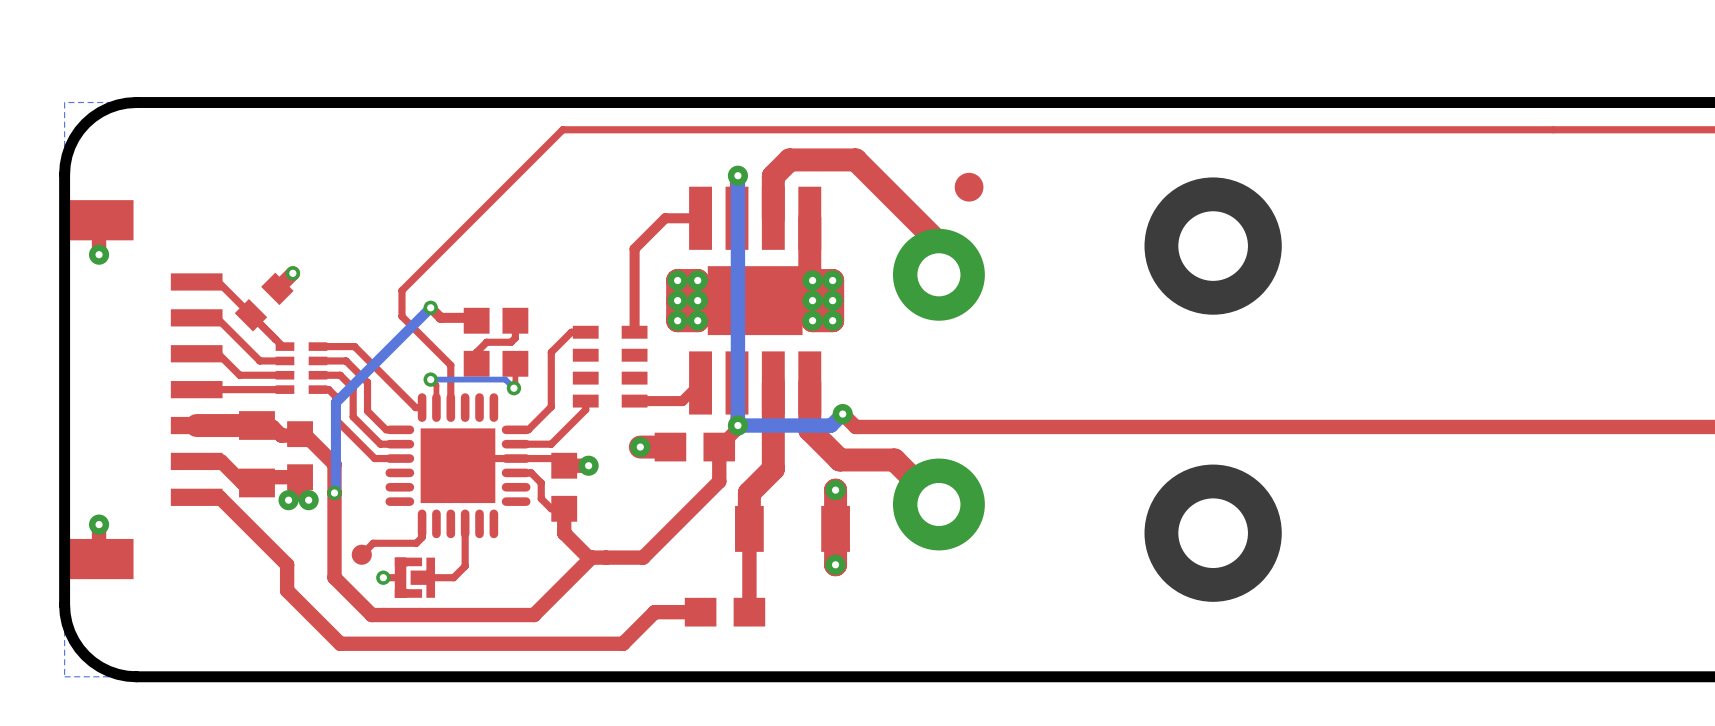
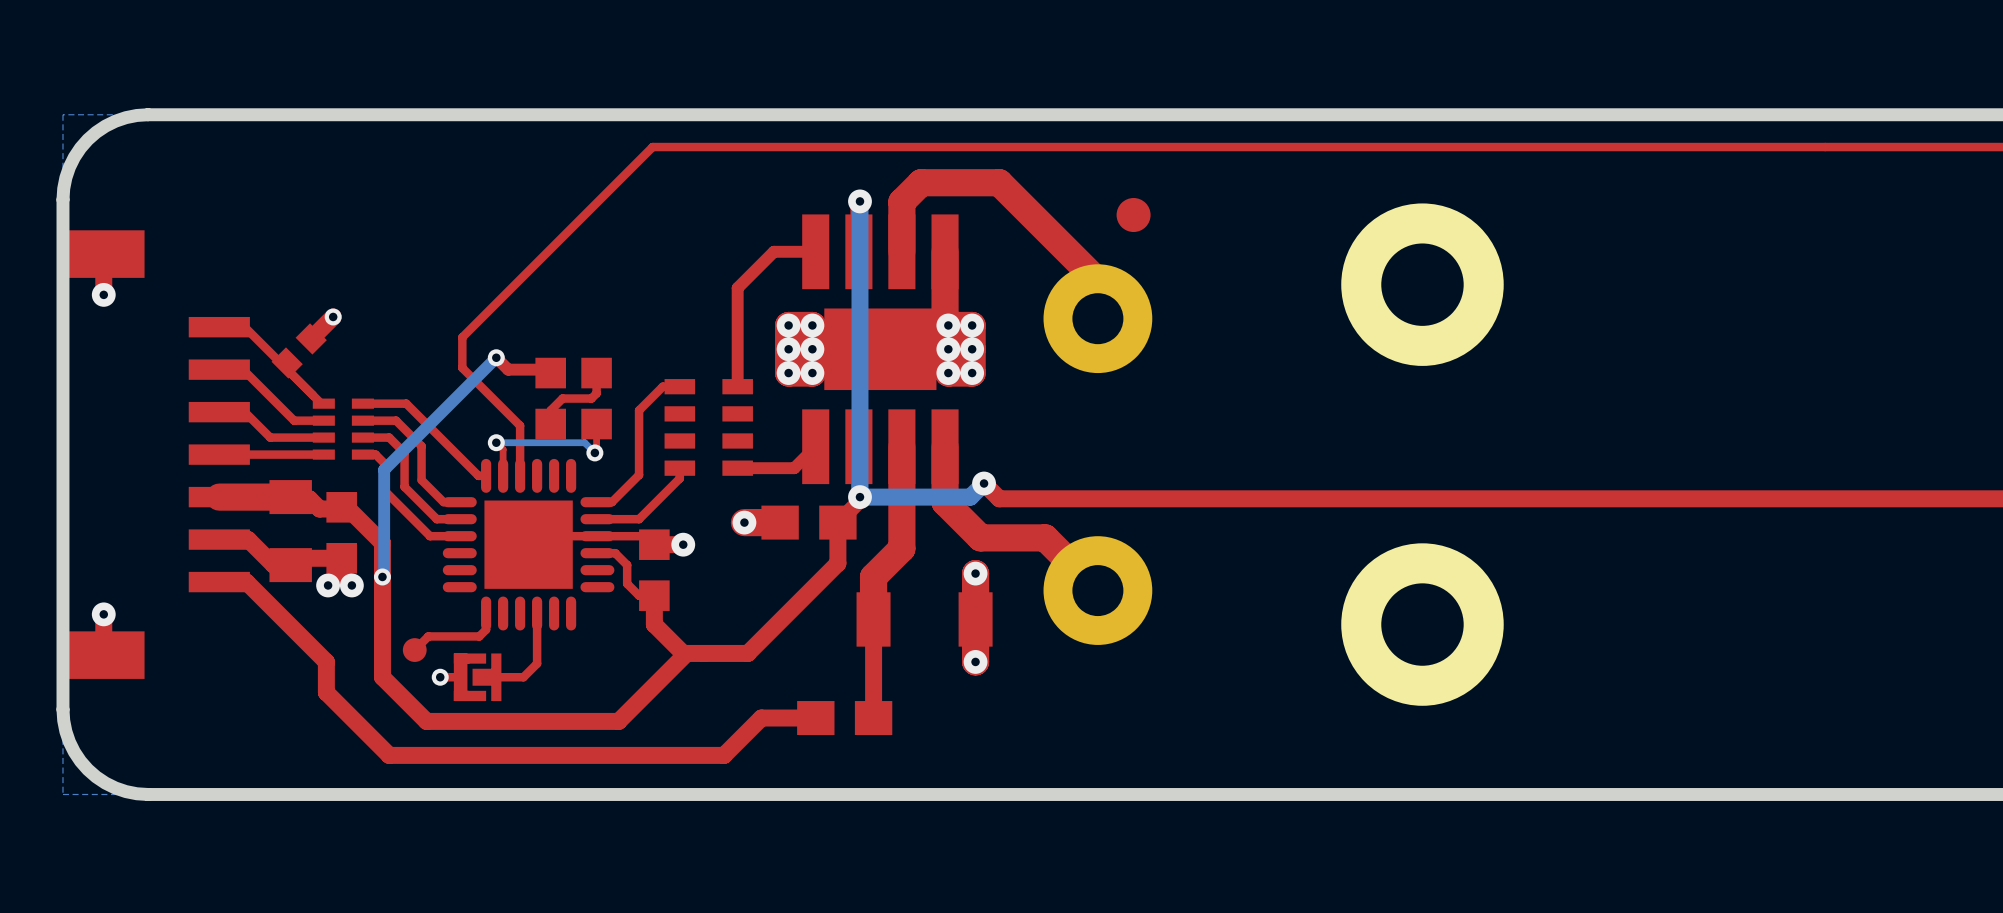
part footprint: [234, 272, 294, 332] -> [271, 323, 327, 379]

